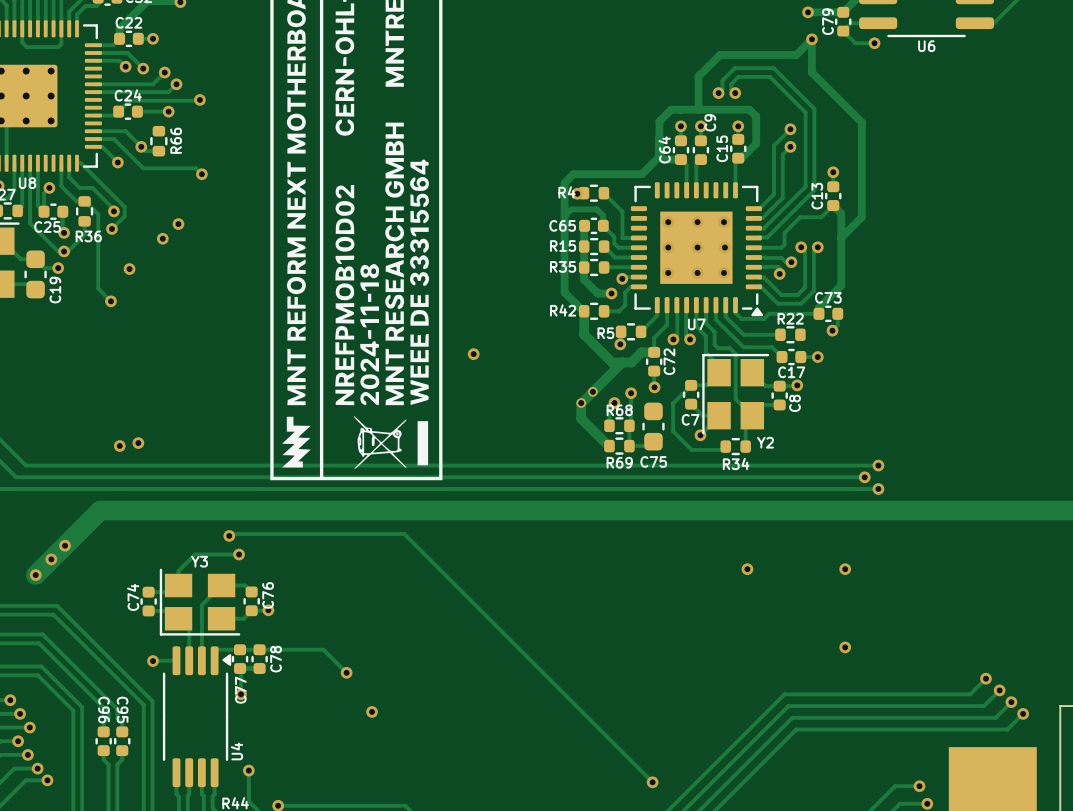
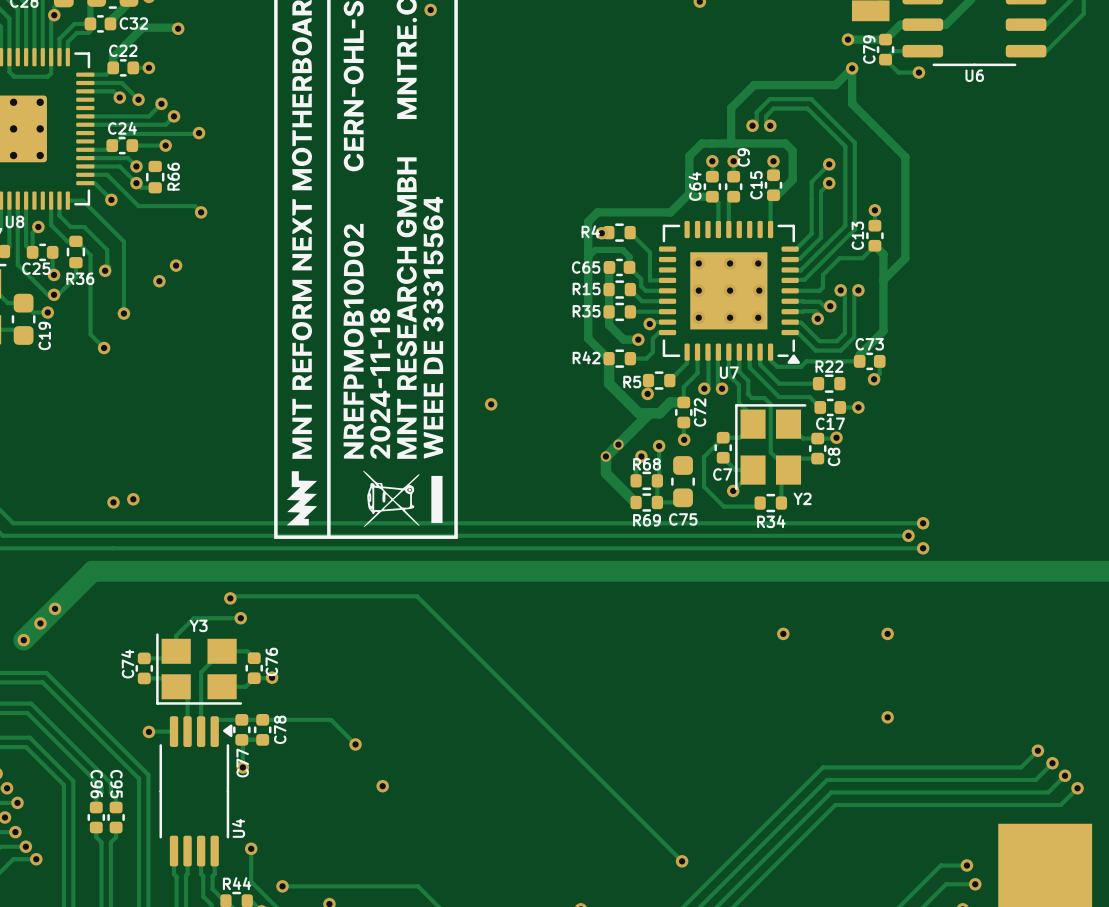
track: none -> (85, 158) (128, 158) (136, 166)
track: (80, 163) (124, 206) (124, 216) (111, 228) -> (72, 200) (82, 200) (123, 241) (123, 313)
track: none -> (107, 252) (107, 264) (109, 266)
via position: (113, 211) -> (136, 166)

